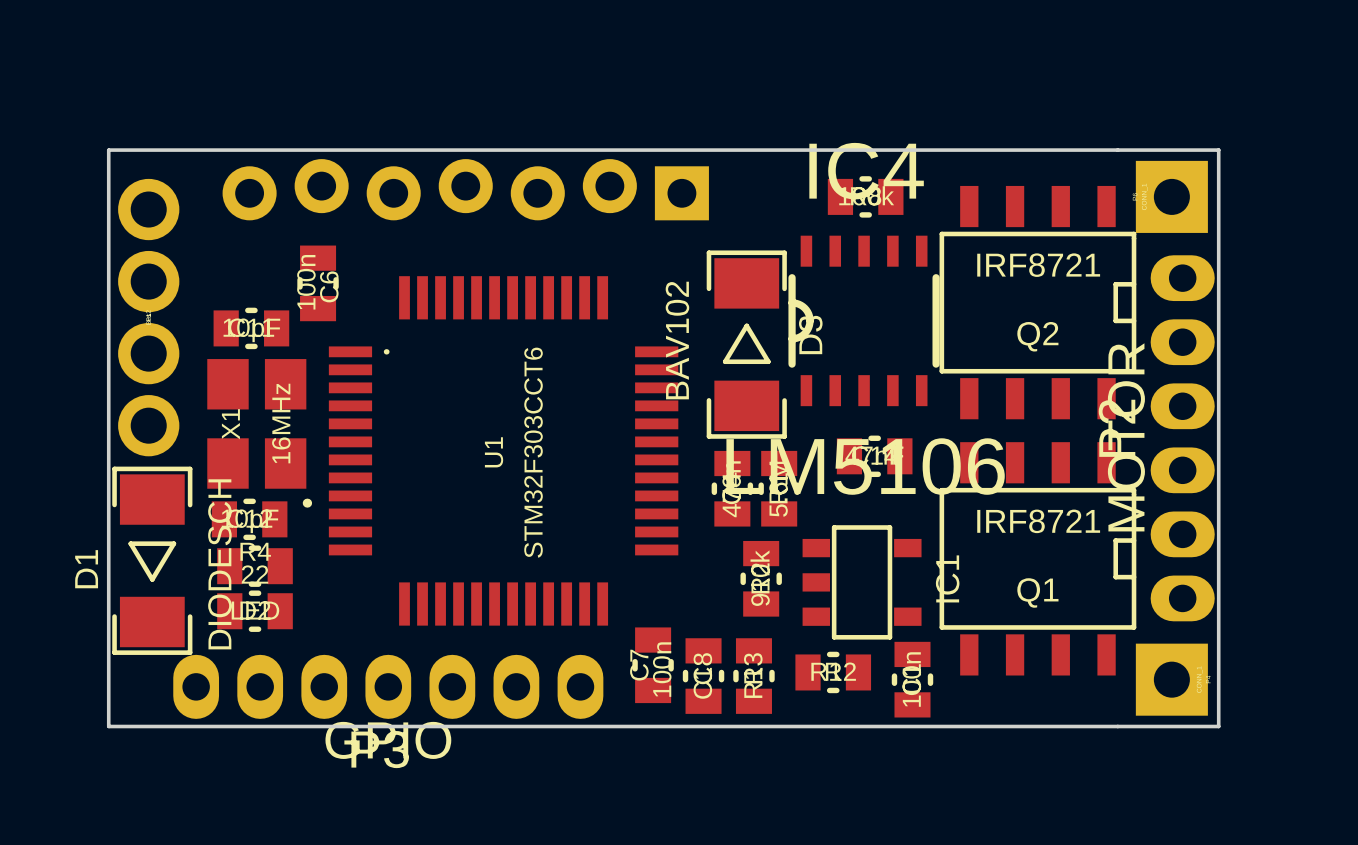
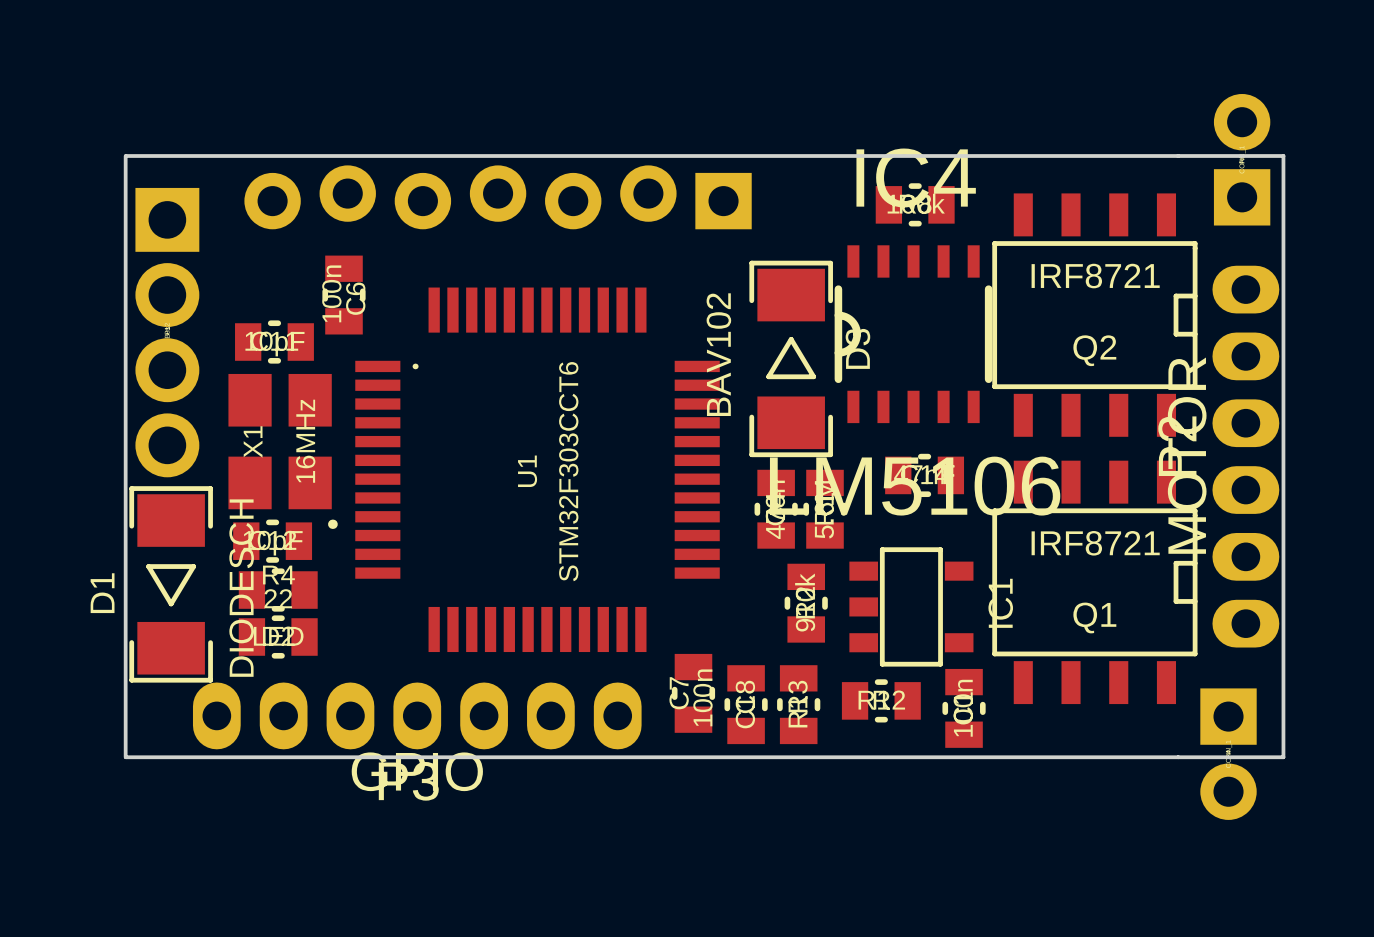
part footprint: [1135, 160, 1208, 233] -> [1213, 94, 1271, 226]
part footprint: [118, 178, 180, 457] -> [135, 187, 200, 478]
part footprint: [1135, 643, 1208, 716] -> [1200, 688, 1257, 820]

